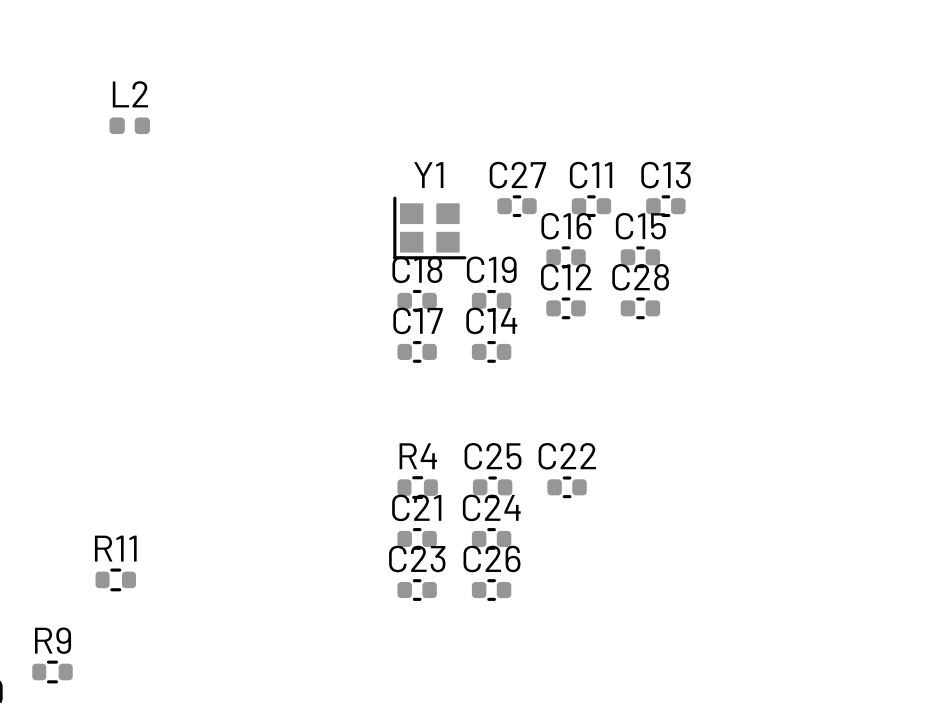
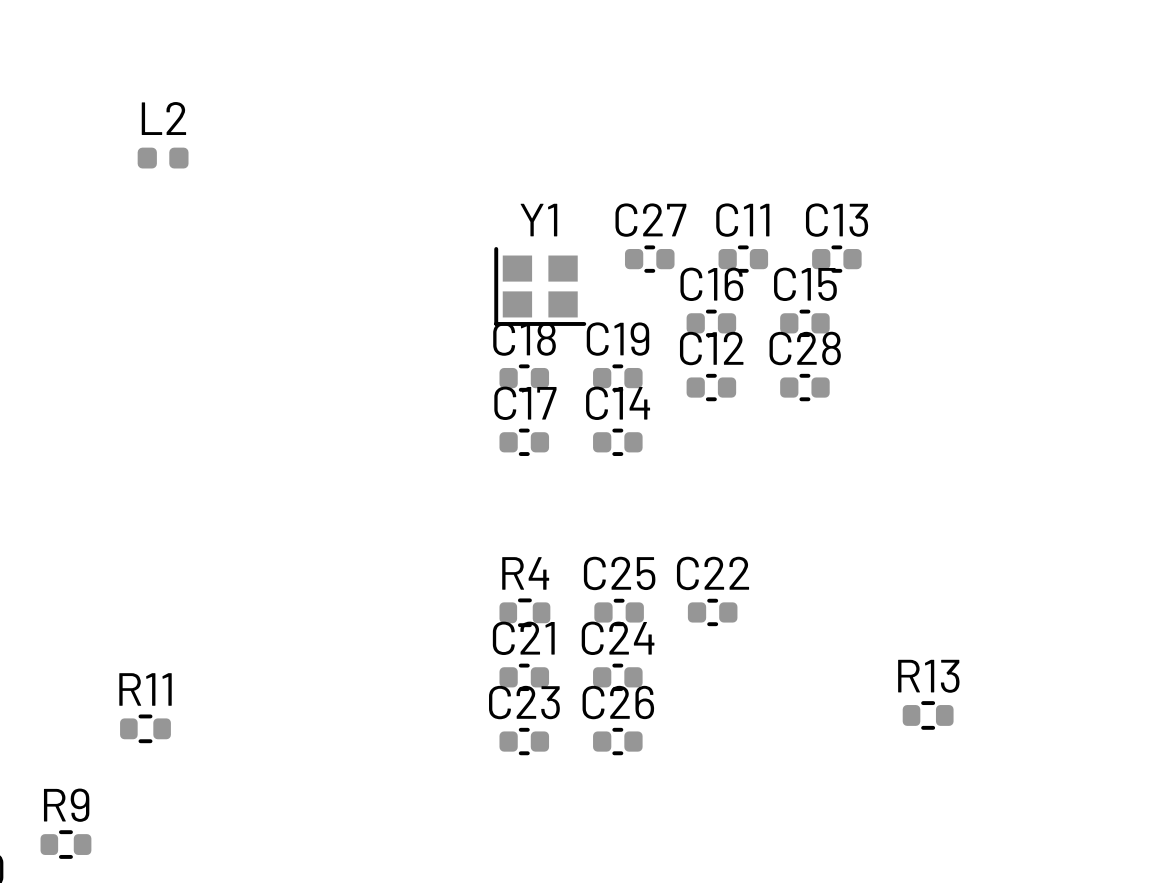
R13: none -> (928, 715)

